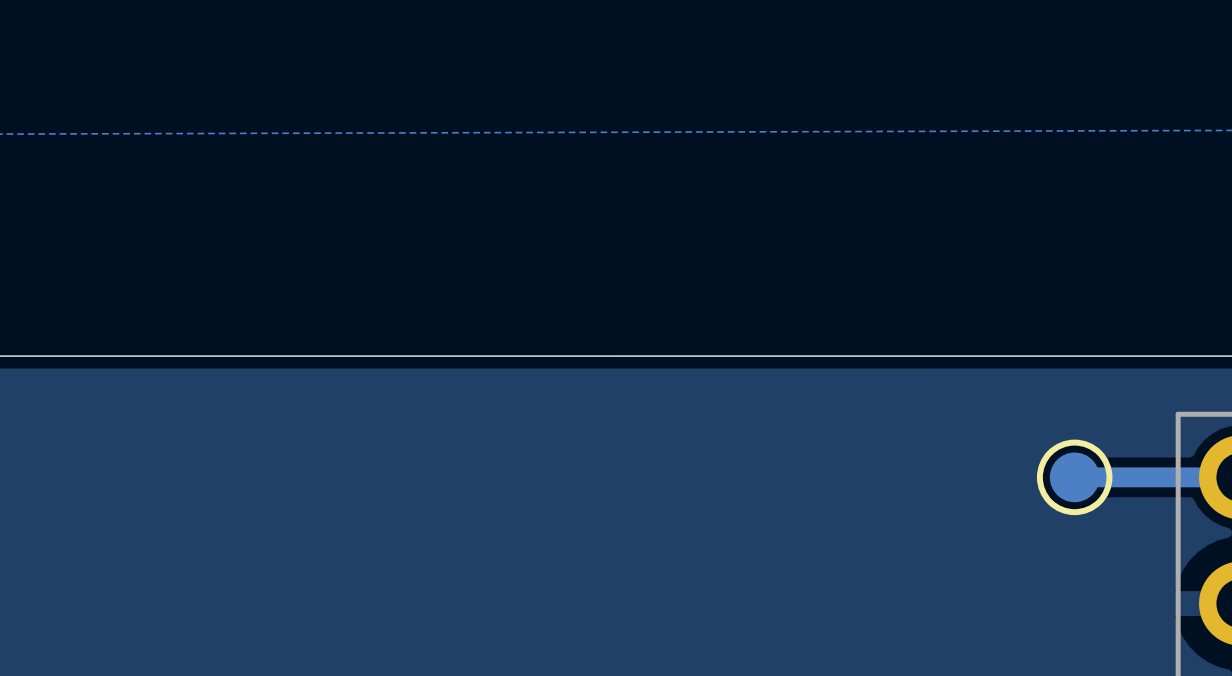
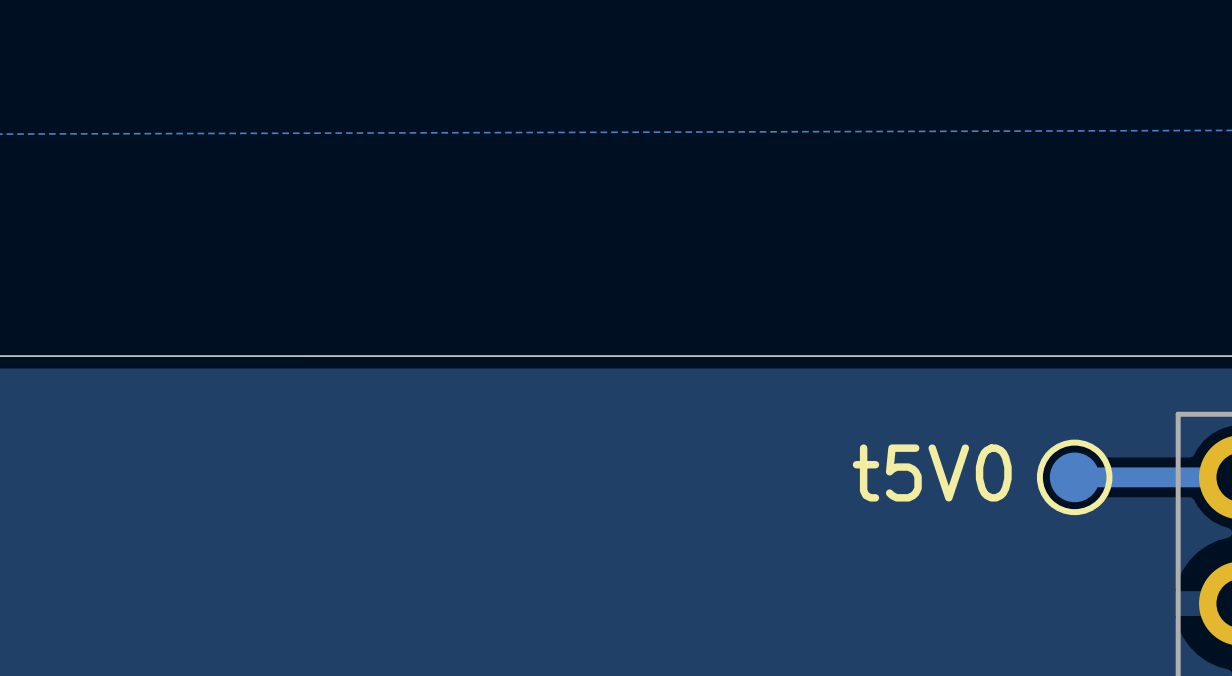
t5V0 name: none -> t5V0 (932, 472)

